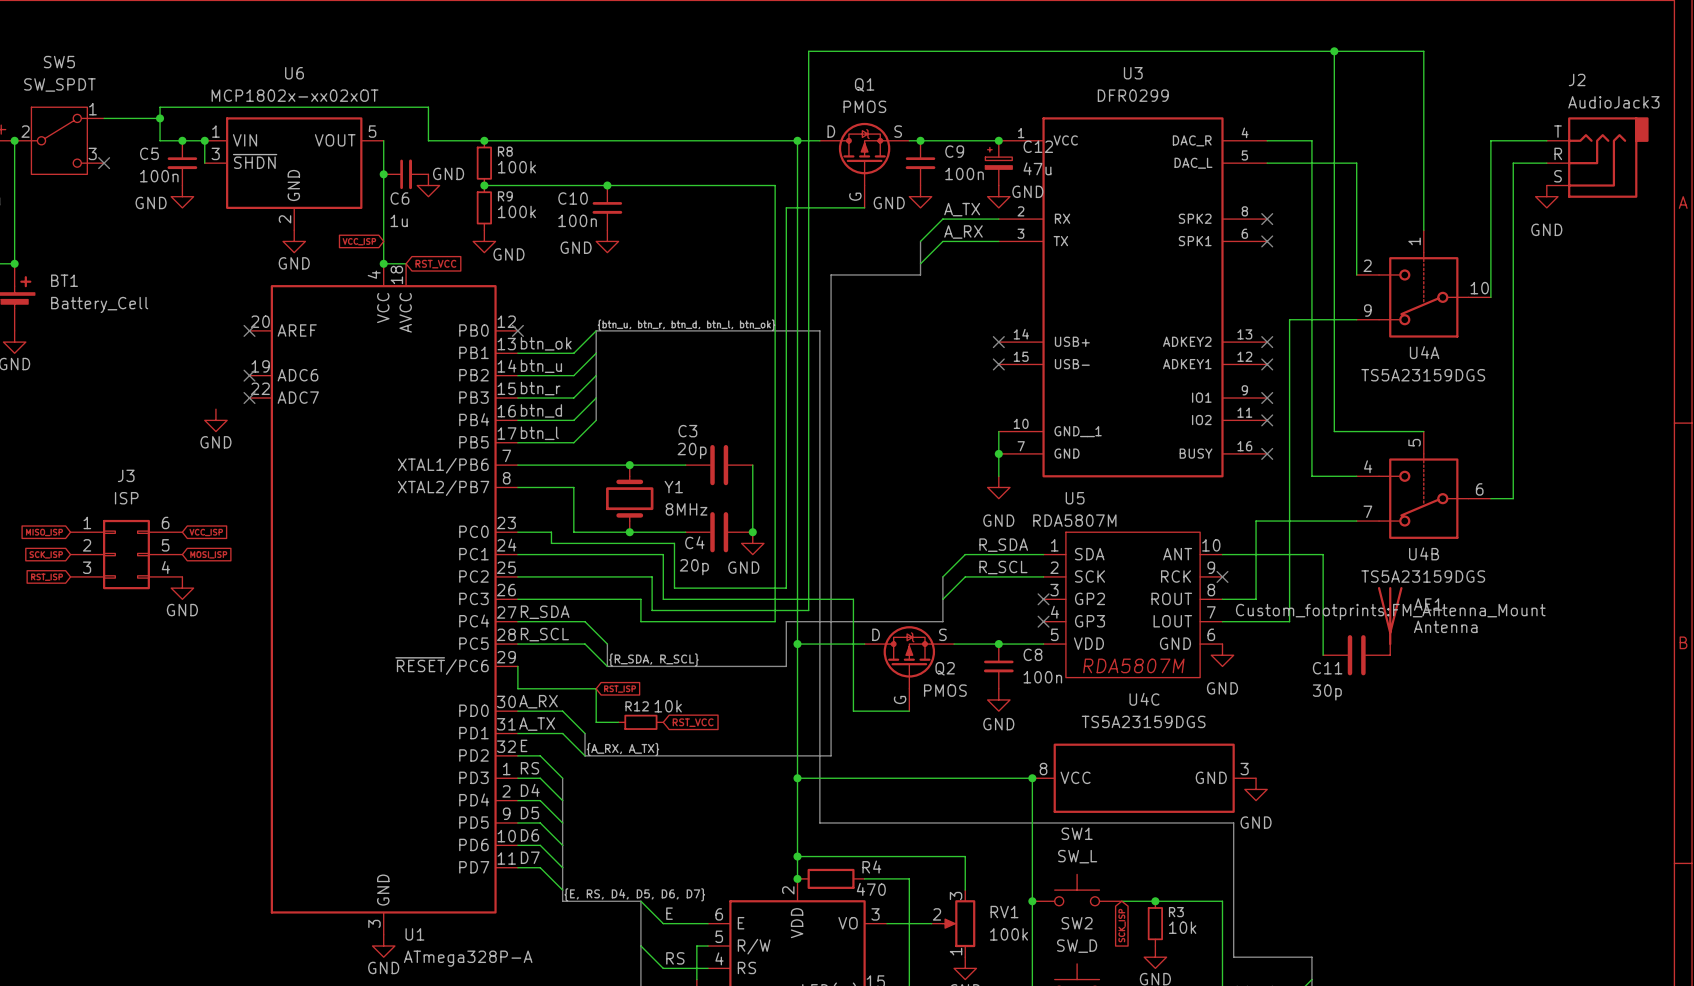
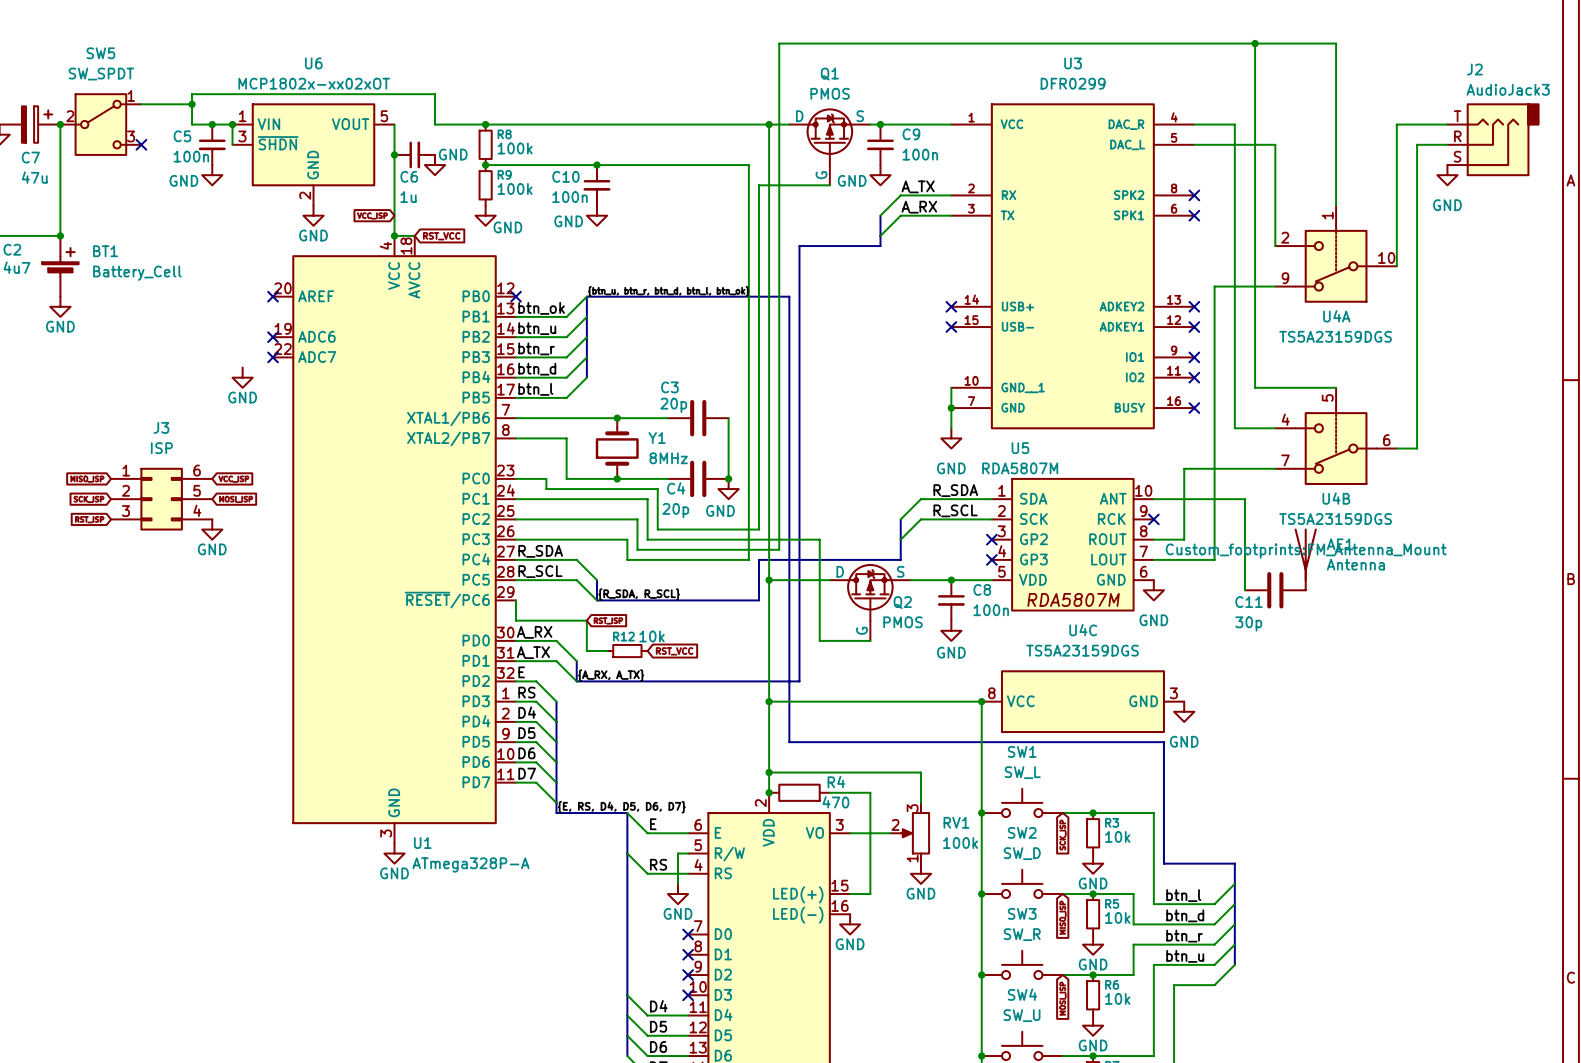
junction: (998, 140) -> none
C12: 47u (998, 163) -> none
power symbol: GND (998, 196) -> none

